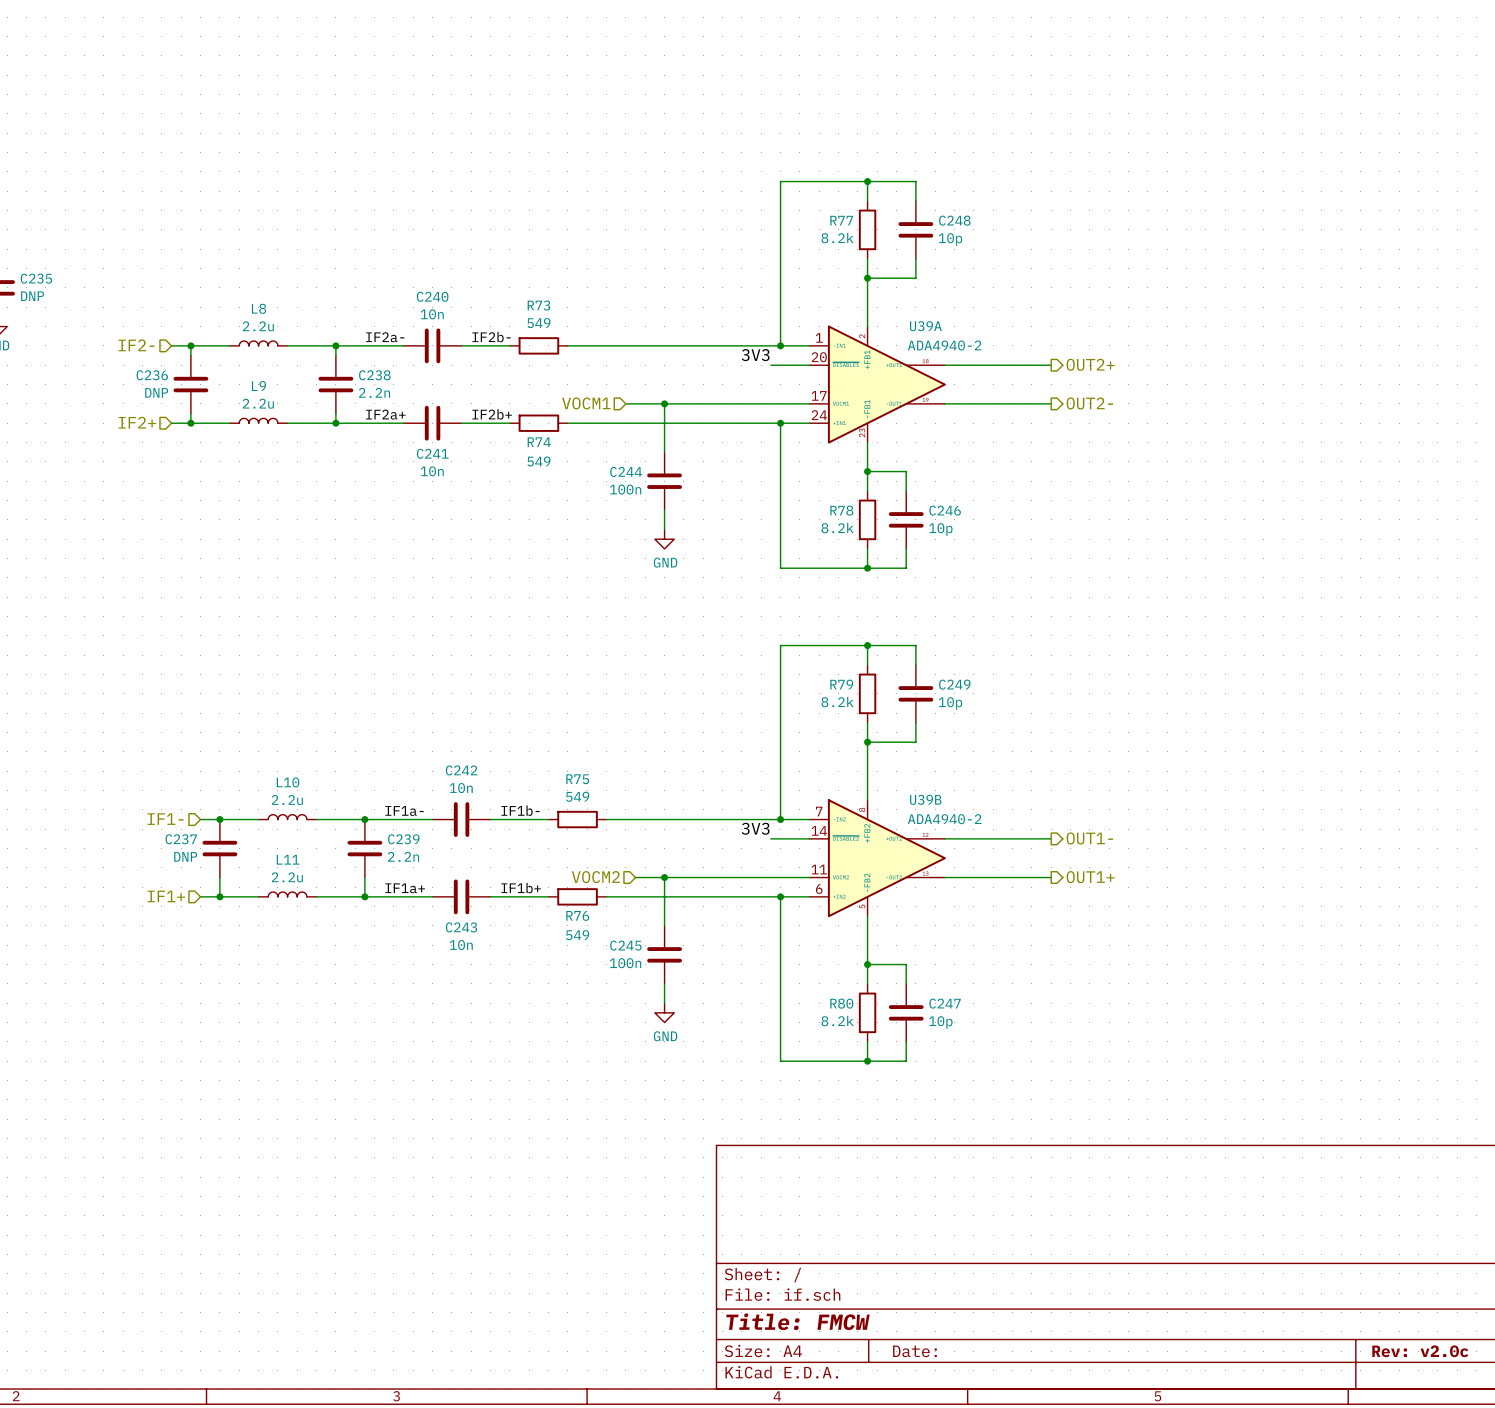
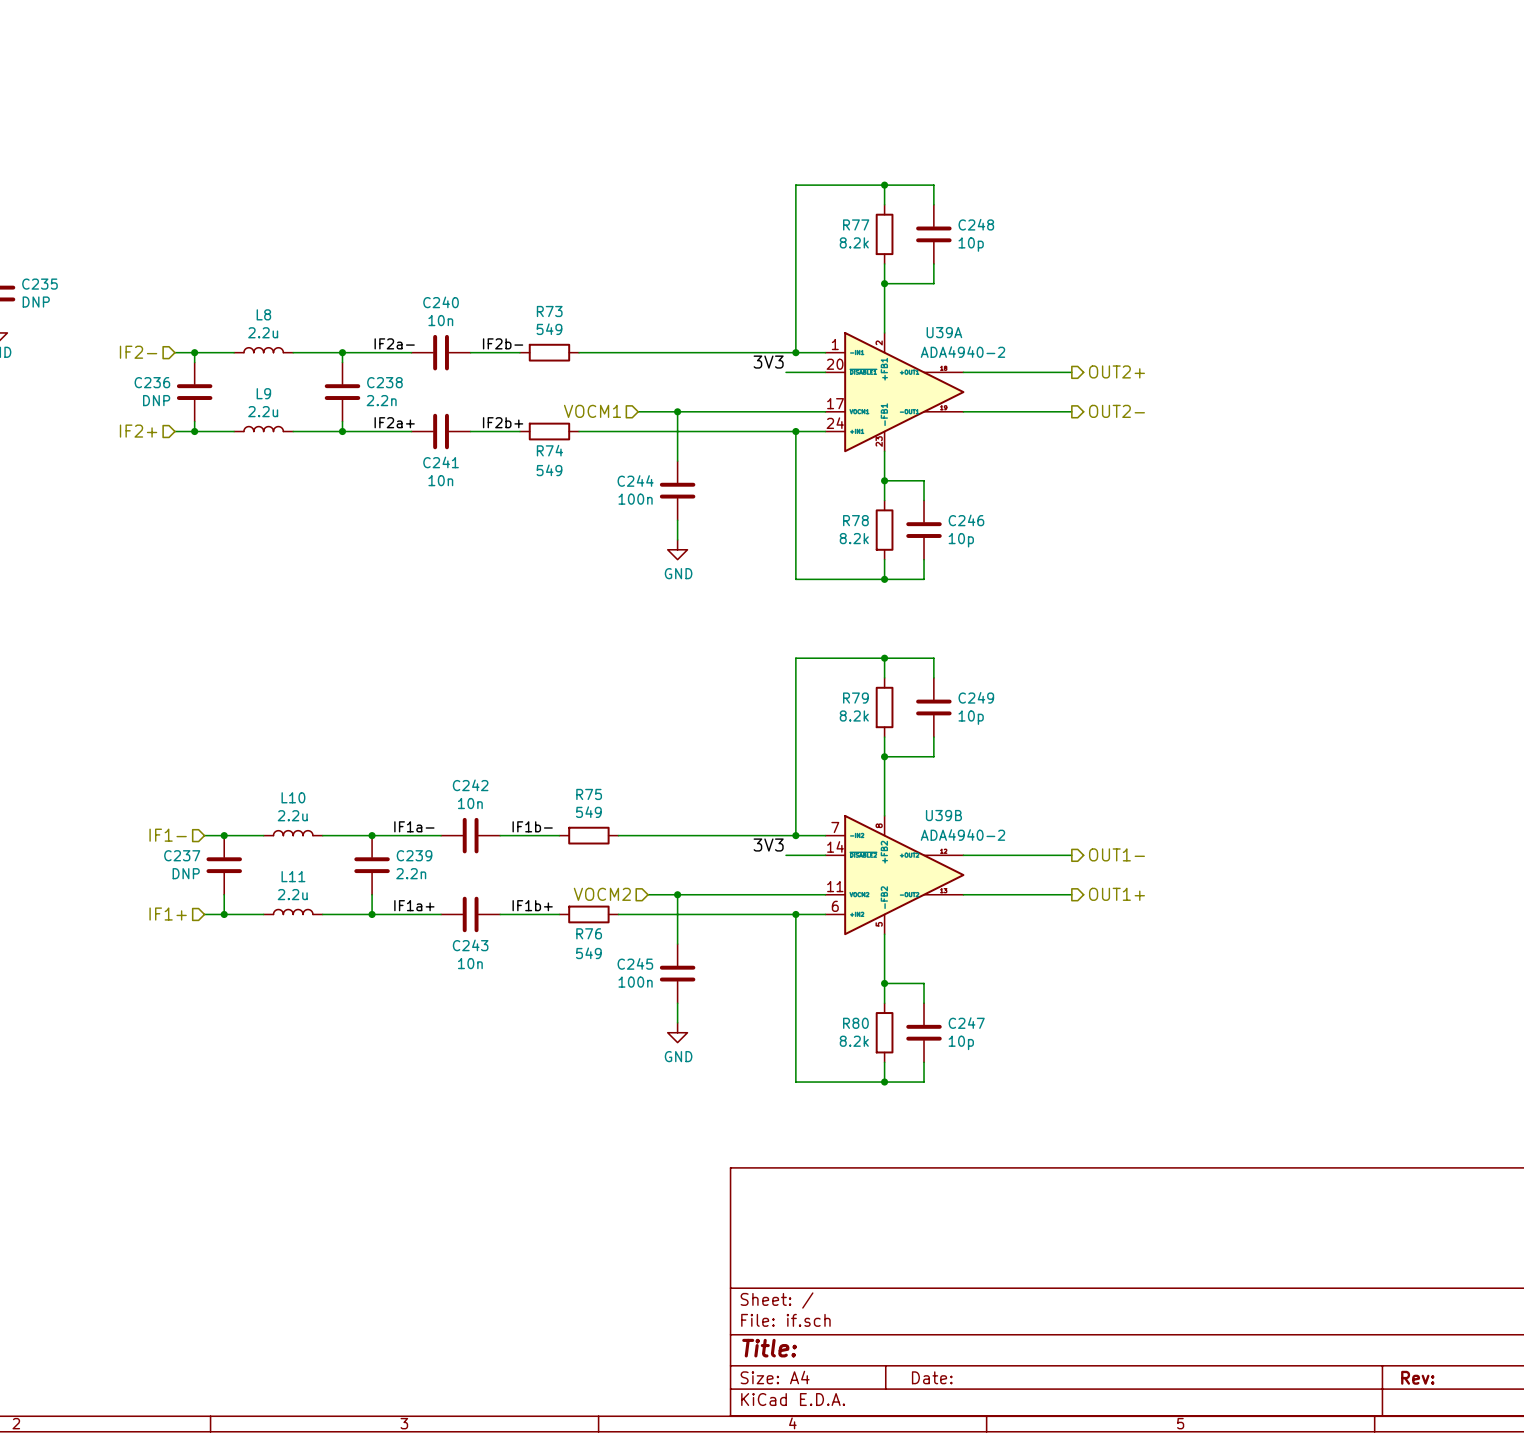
title block: Title: FMCW (797, 1321) -> Title: (769, 1348)
title block: Rev: v2.0c (1420, 1351) -> Rev: (1417, 1377)

